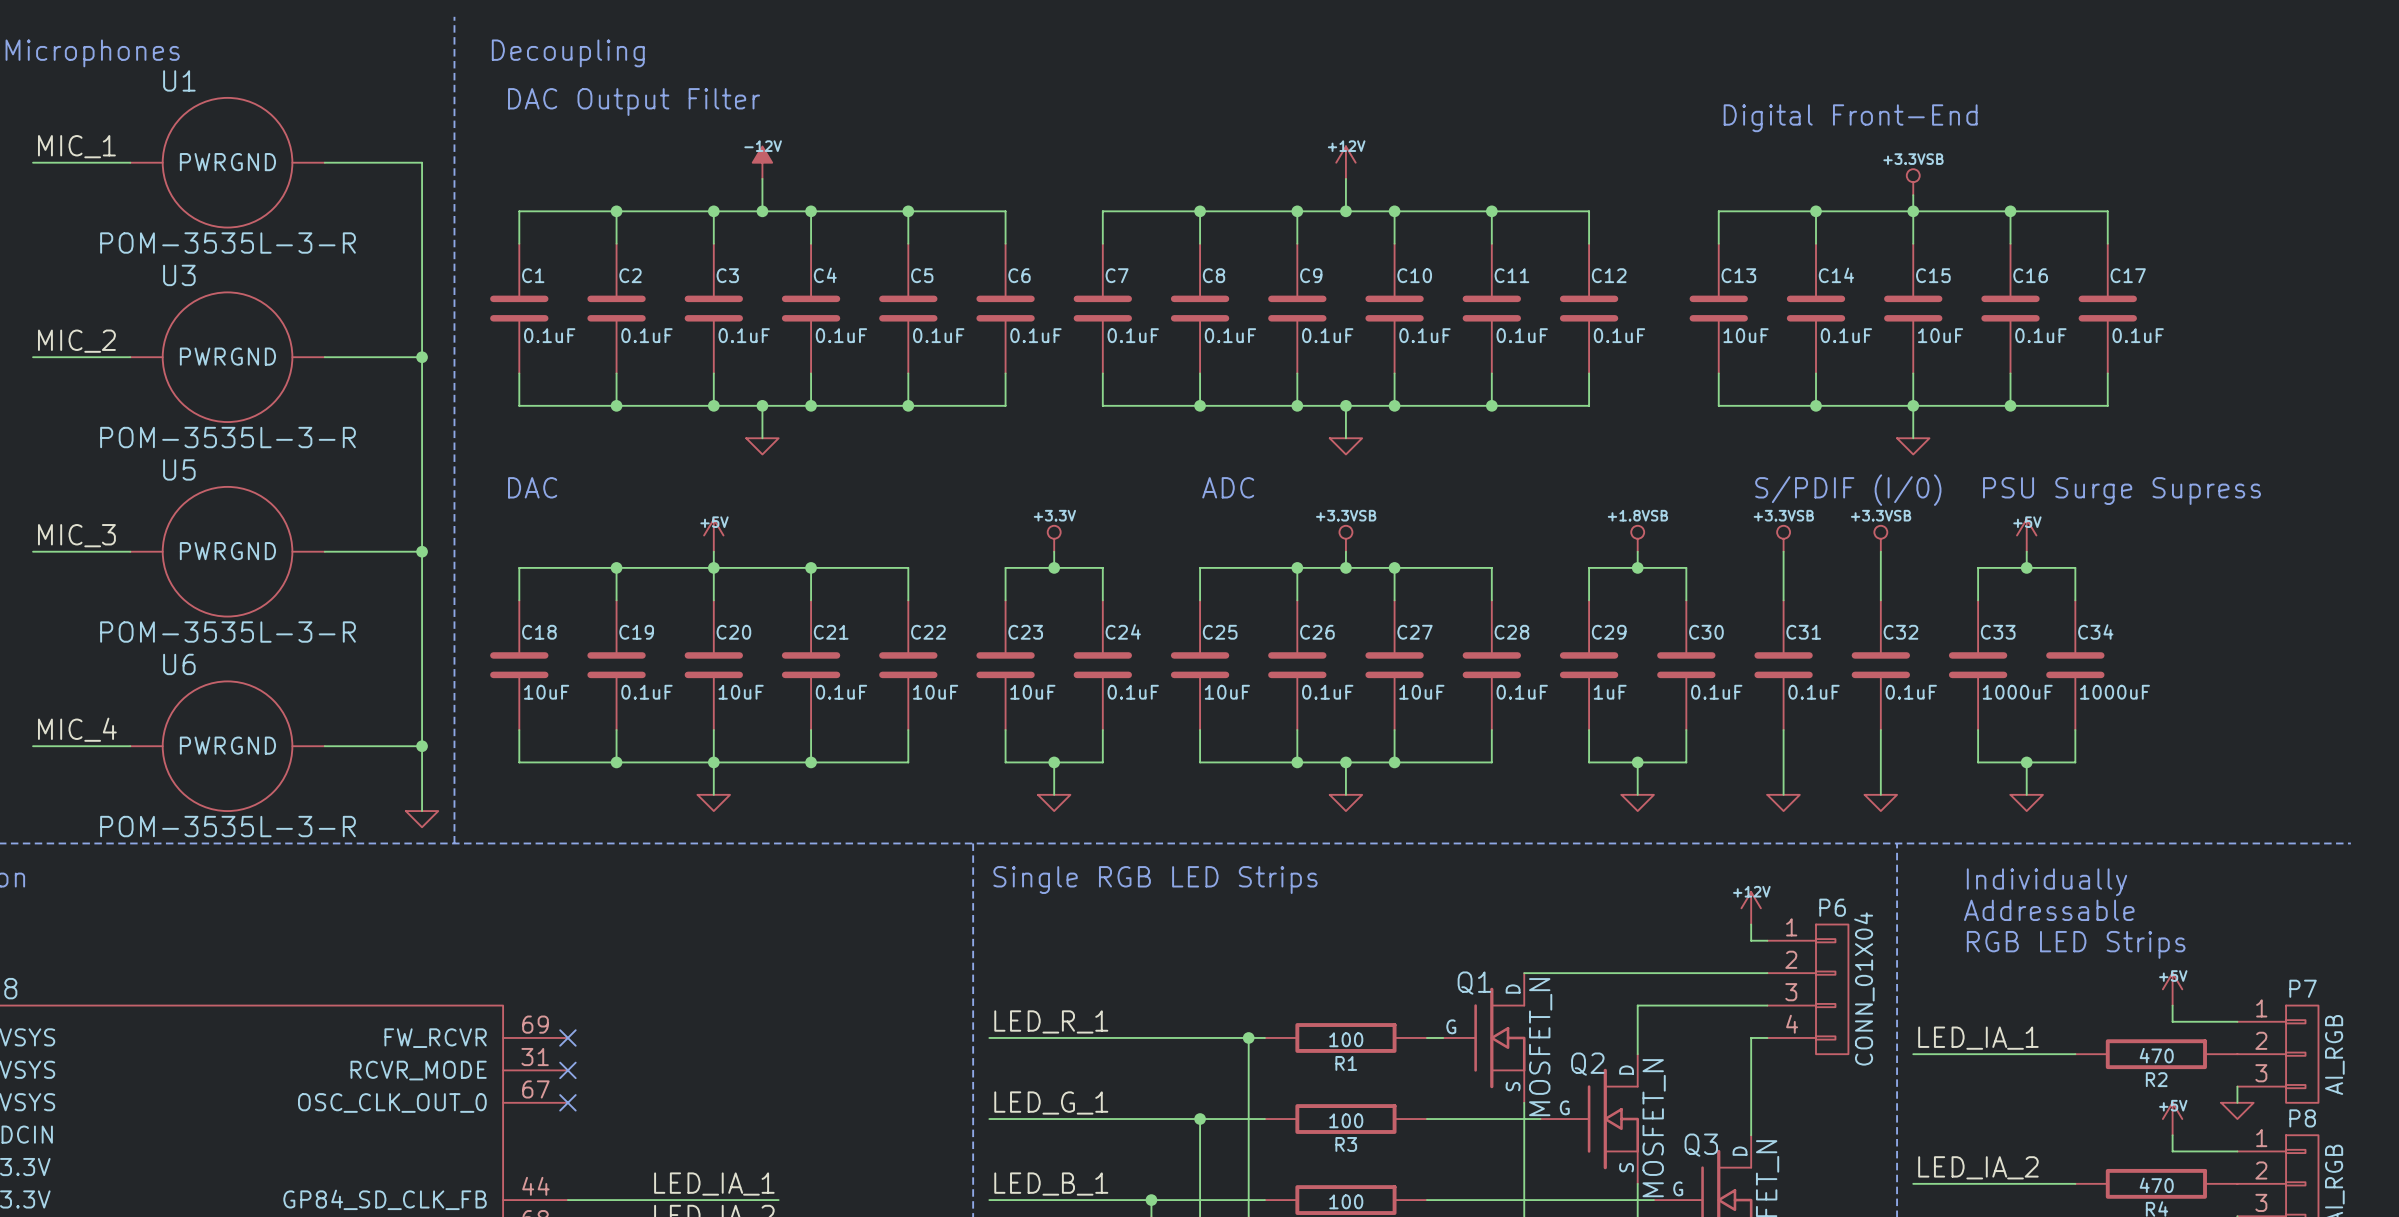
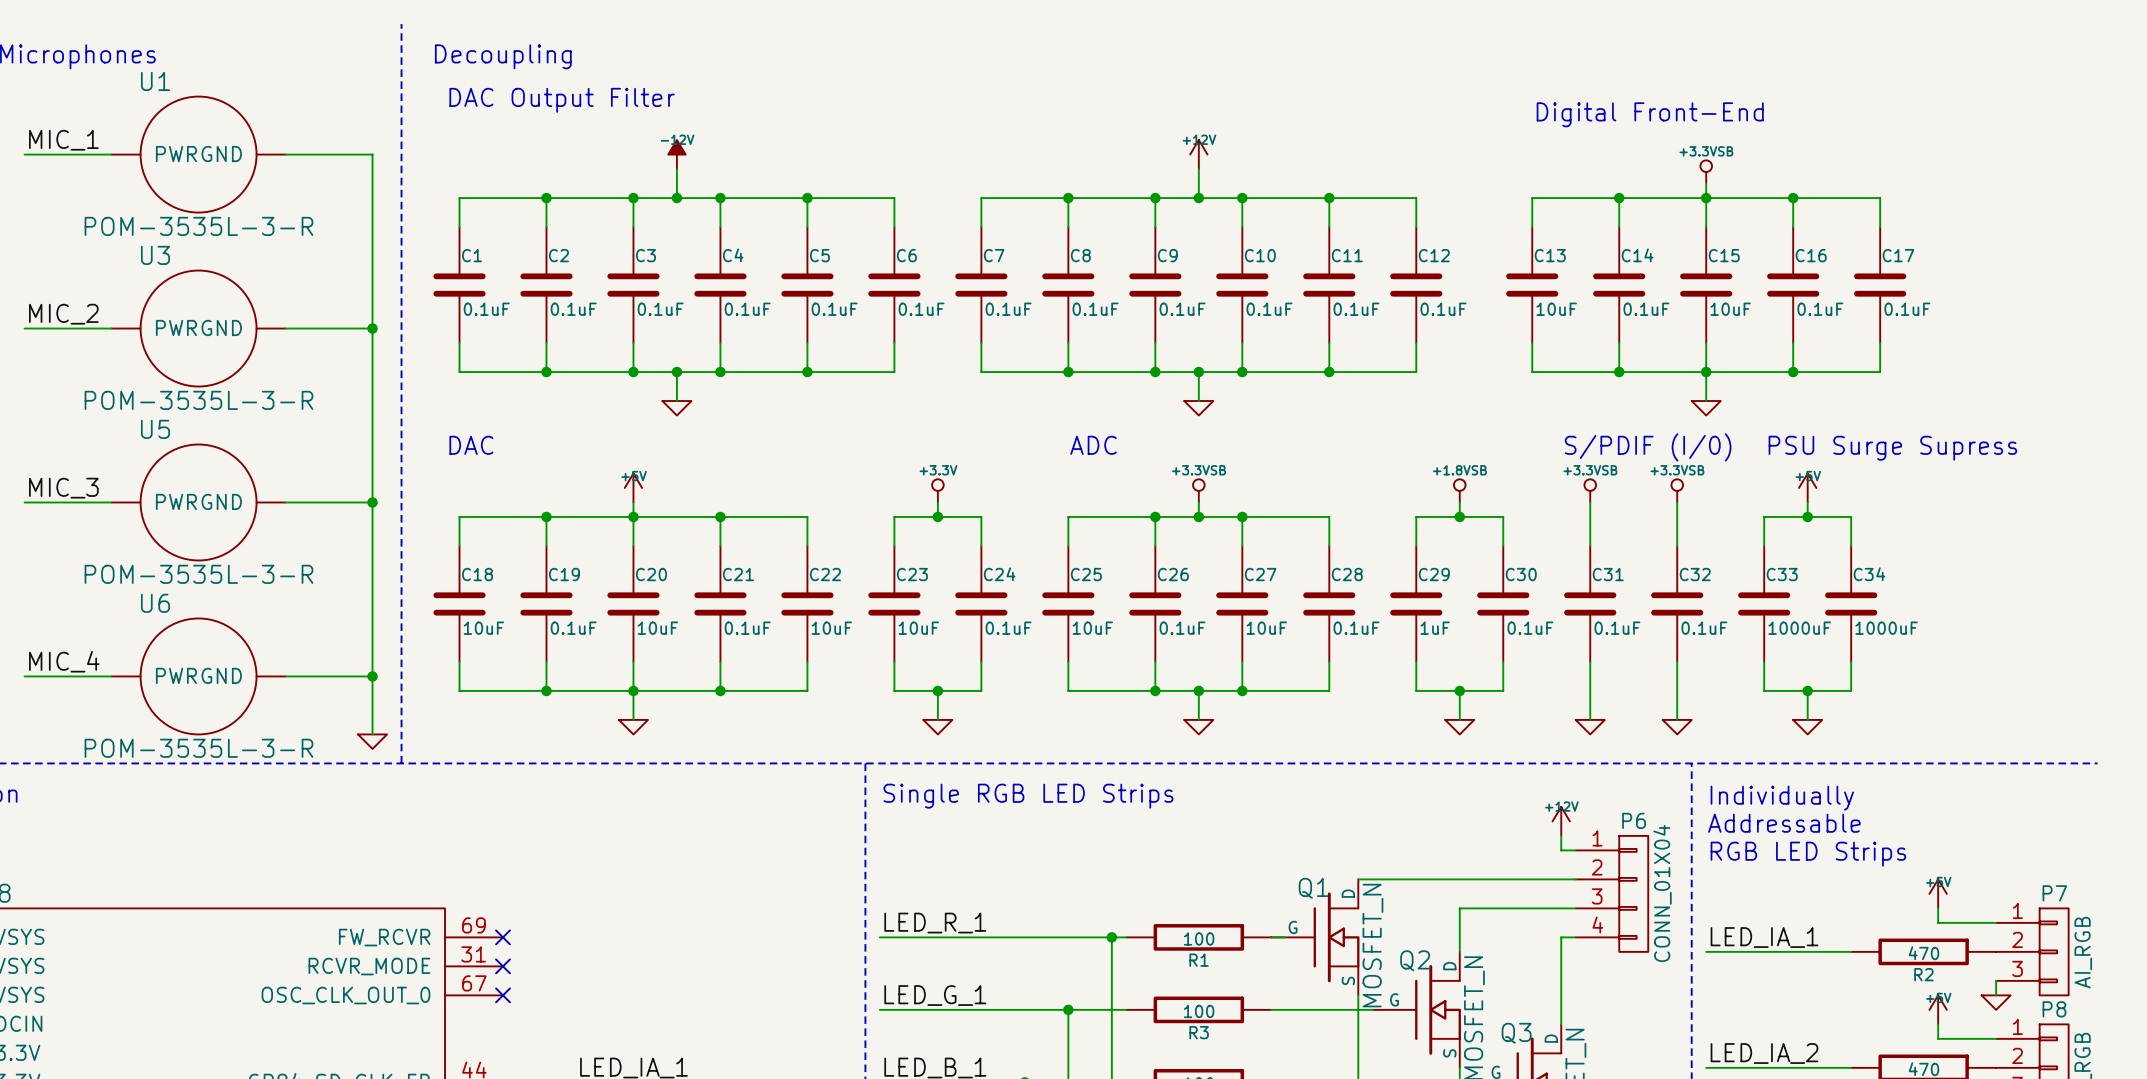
text position: Individually (2046, 882) -> Individually (1782, 798)
text position: Addressable (2049, 910) -> Addressable (1784, 823)
text position: RGB LED Strips (2076, 944) -> RGB LED Strips (1808, 854)

